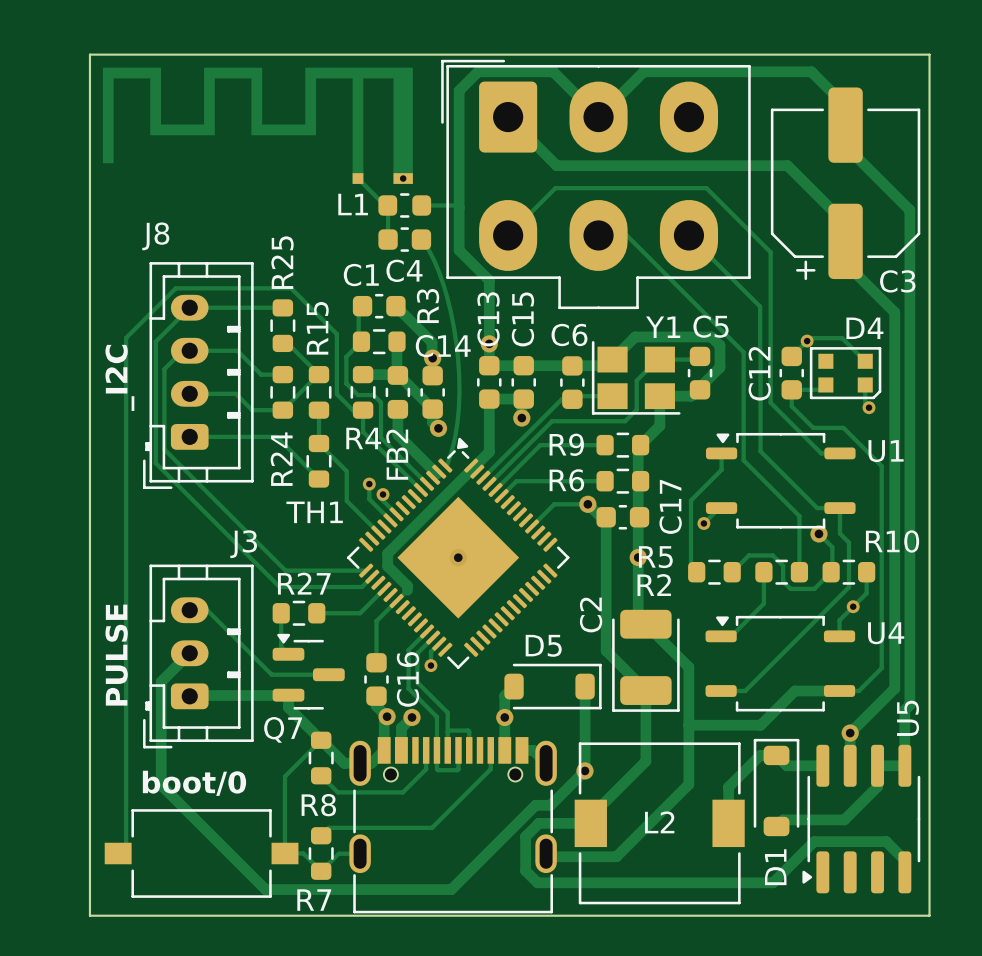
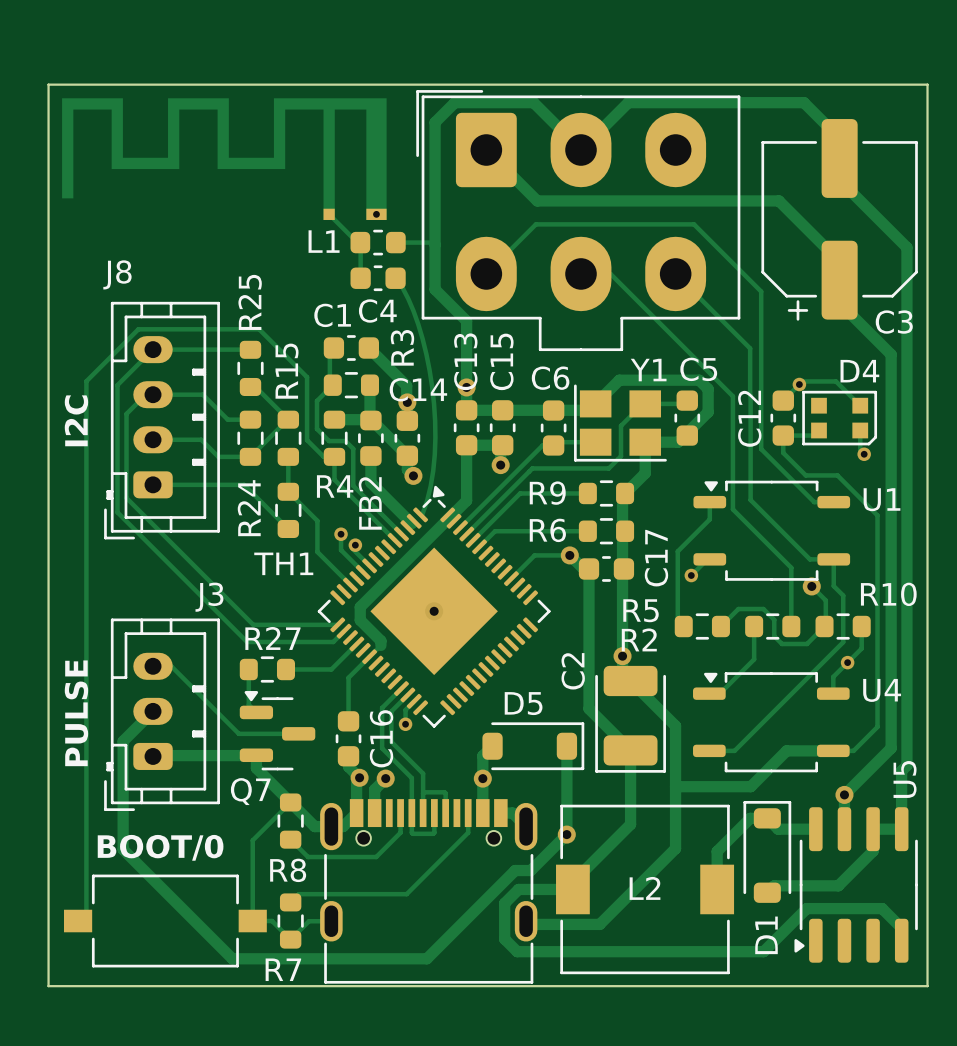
text: _I2C (119, 377) -> I2C (76, 420)
via position: (638, 557) -> (622, 656)
text: boot/0 (194, 783) -> BOOT/0 (160, 847)

